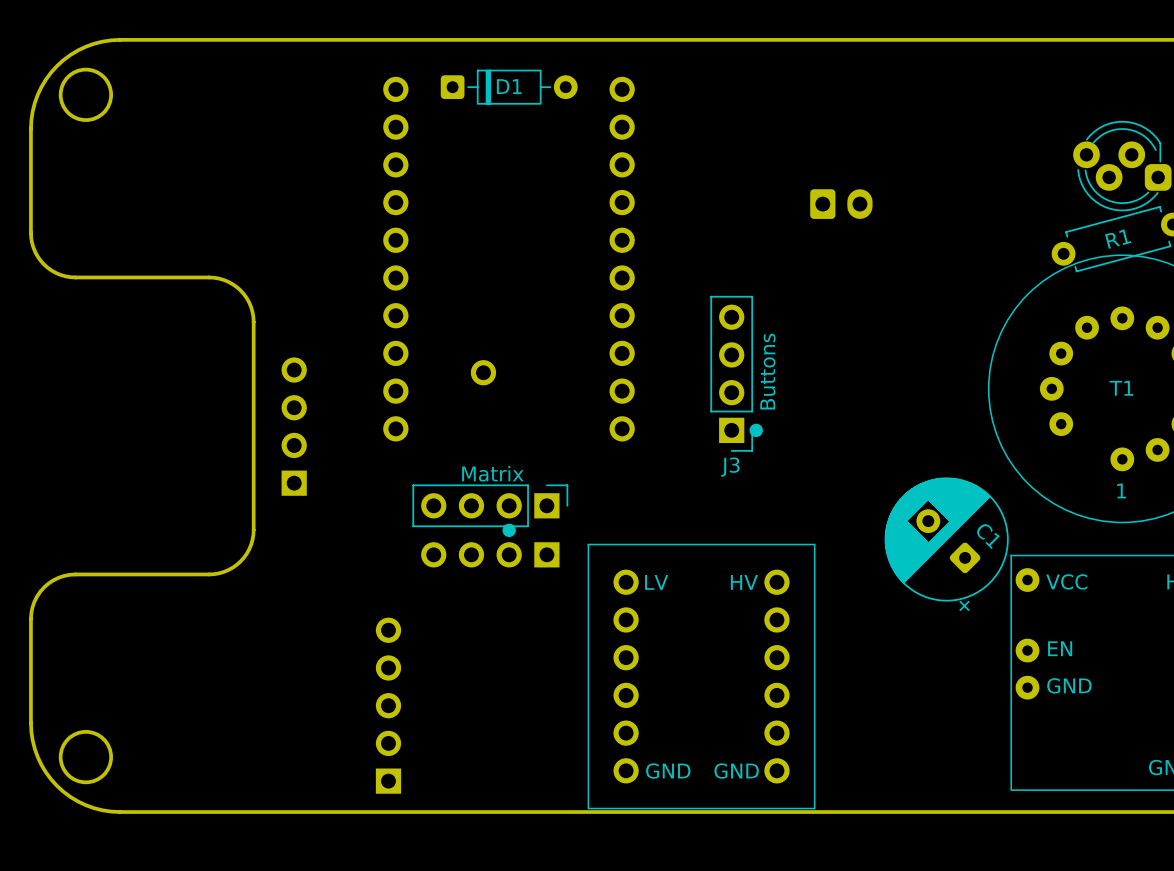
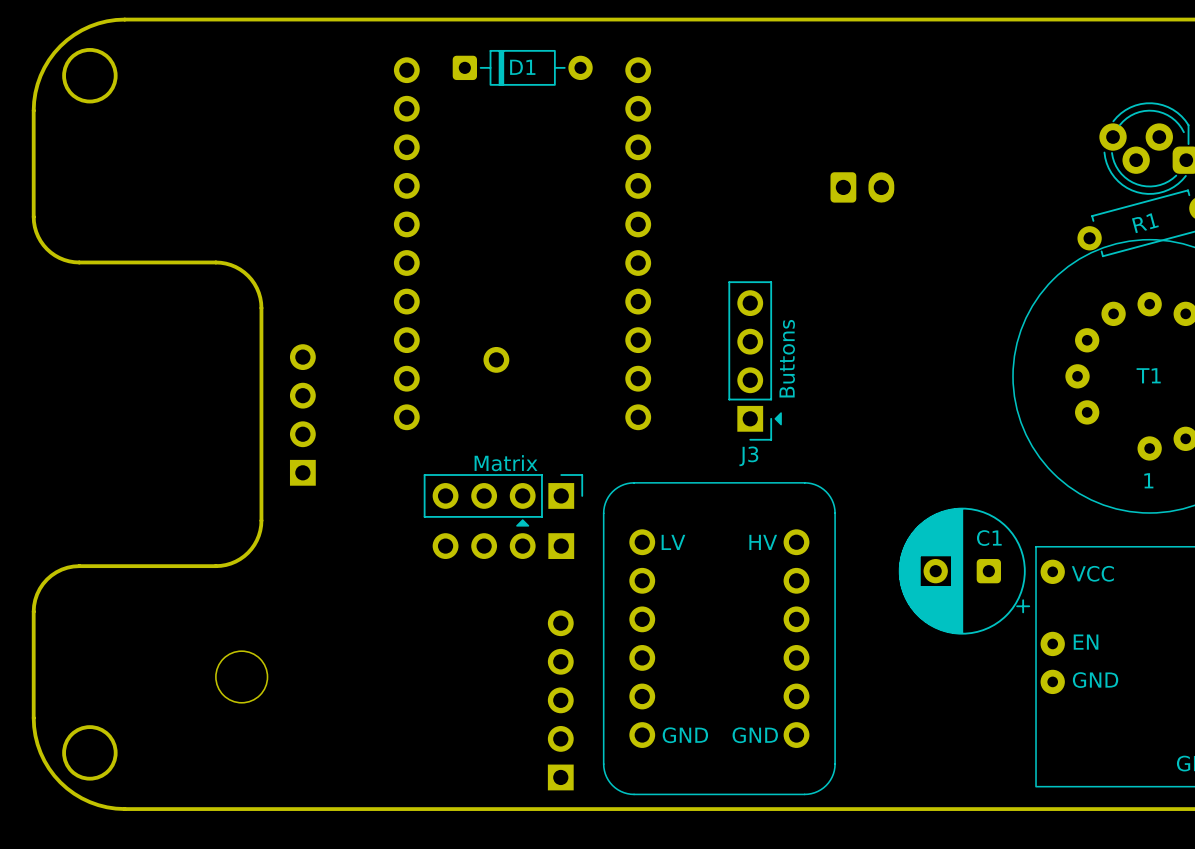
drawing shape: [749, 423, 763, 438] -> [774, 412, 782, 426]
drawing shape: [502, 523, 516, 538] -> [516, 519, 530, 527]
C1 rotation: 0° (946, 544) -> 45° counterclockwise (964, 571)
part: none -> (719, 638)
round board edge: none -> [215, 650, 268, 704]
part: (701, 676) -> none
part position: (388, 705) -> (560, 700)

